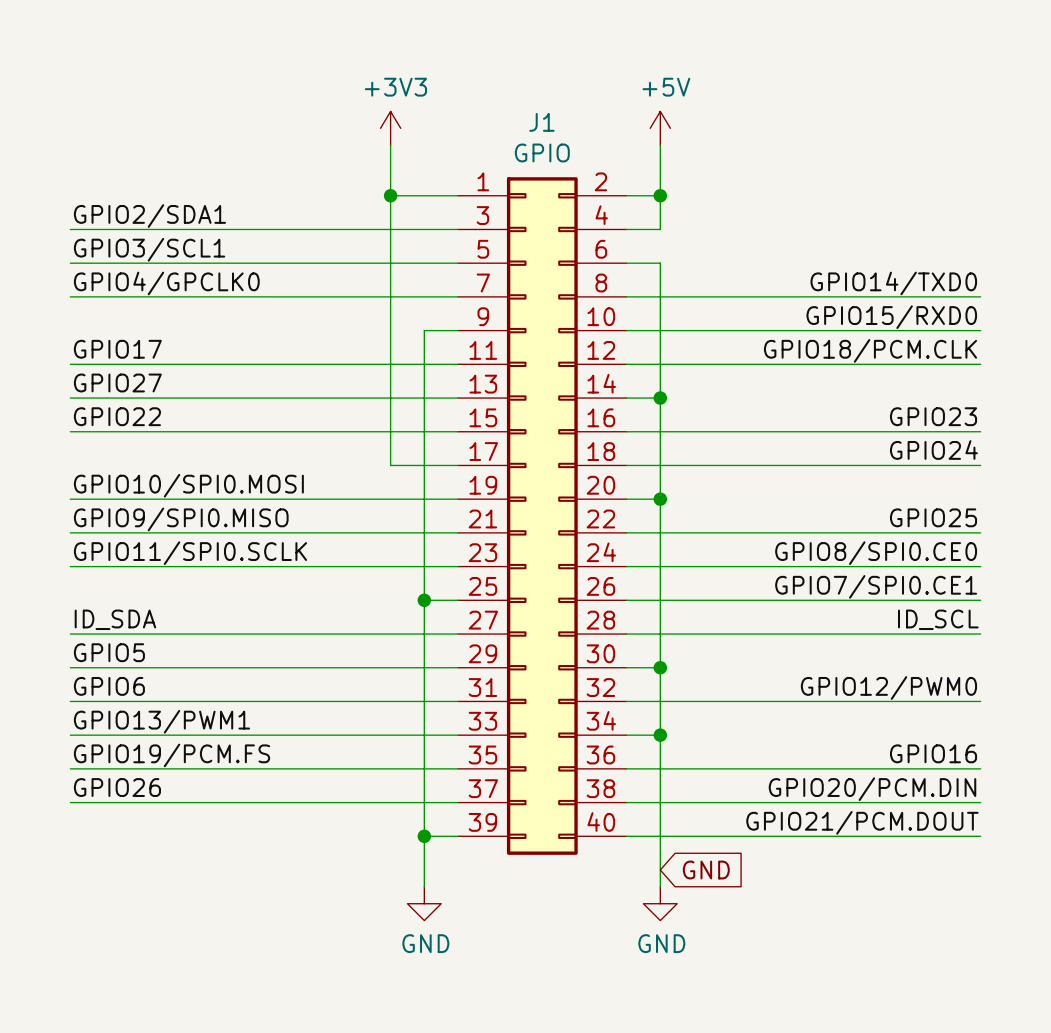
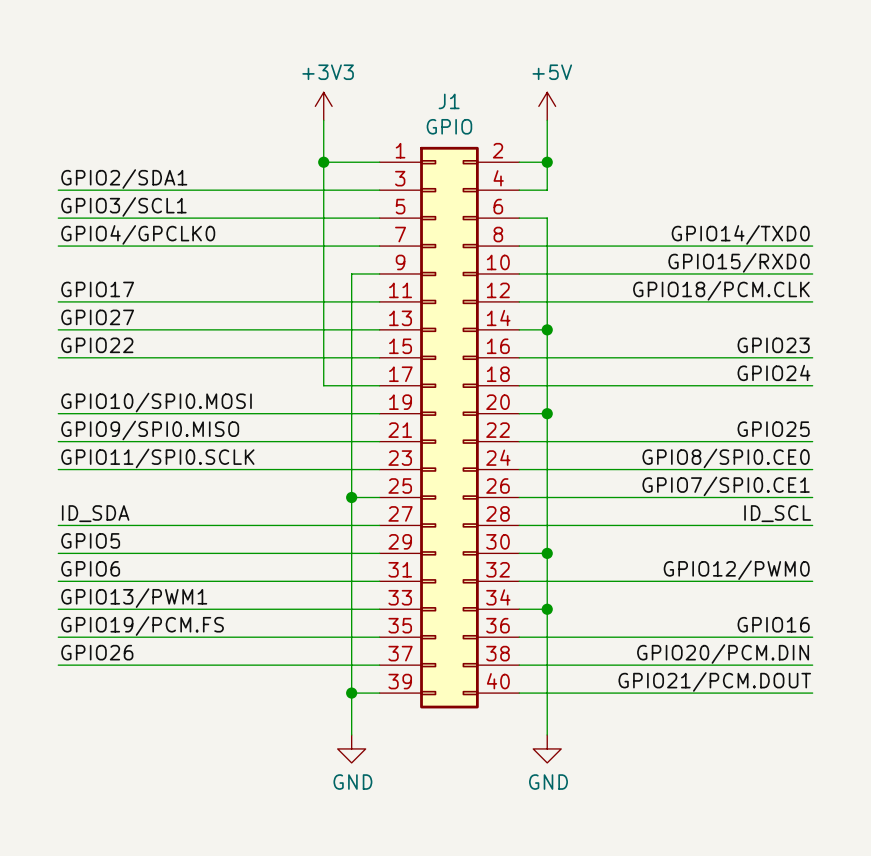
global label: GND (706, 870) -> none

